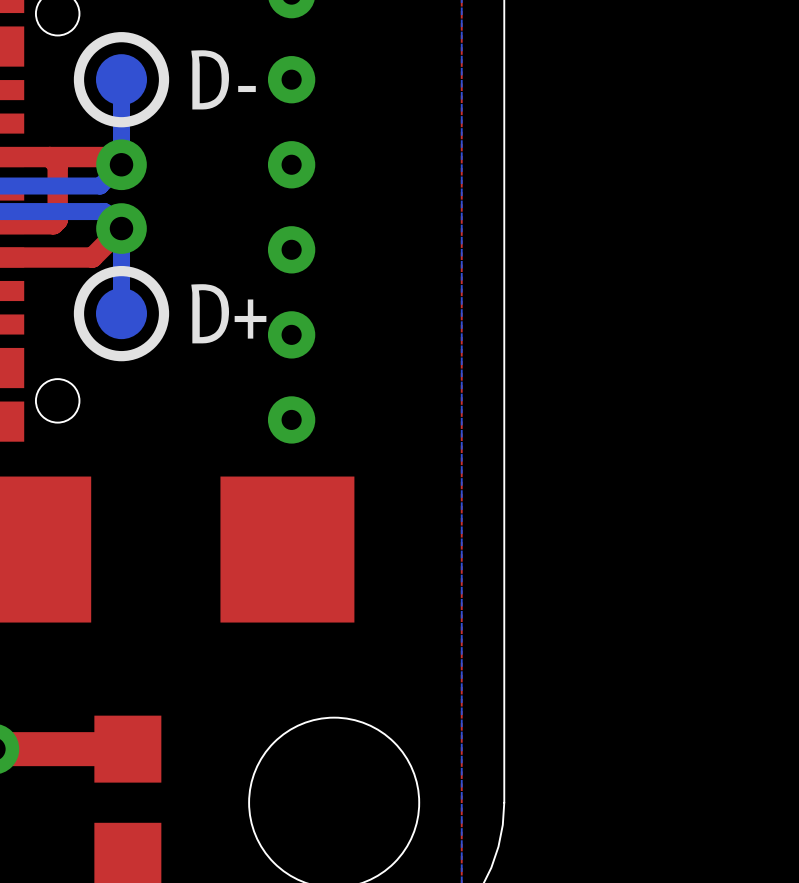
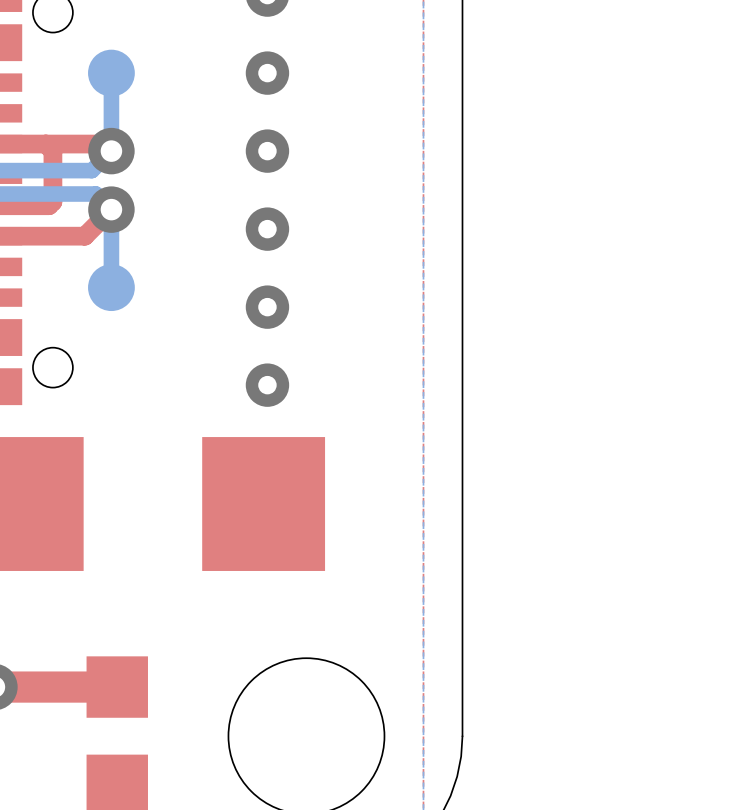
drawing: [73, 32, 170, 128] -> none
text: D- (223, 79) -> none
drawing: [73, 265, 170, 362] -> none
text: D+ (228, 313) -> none

